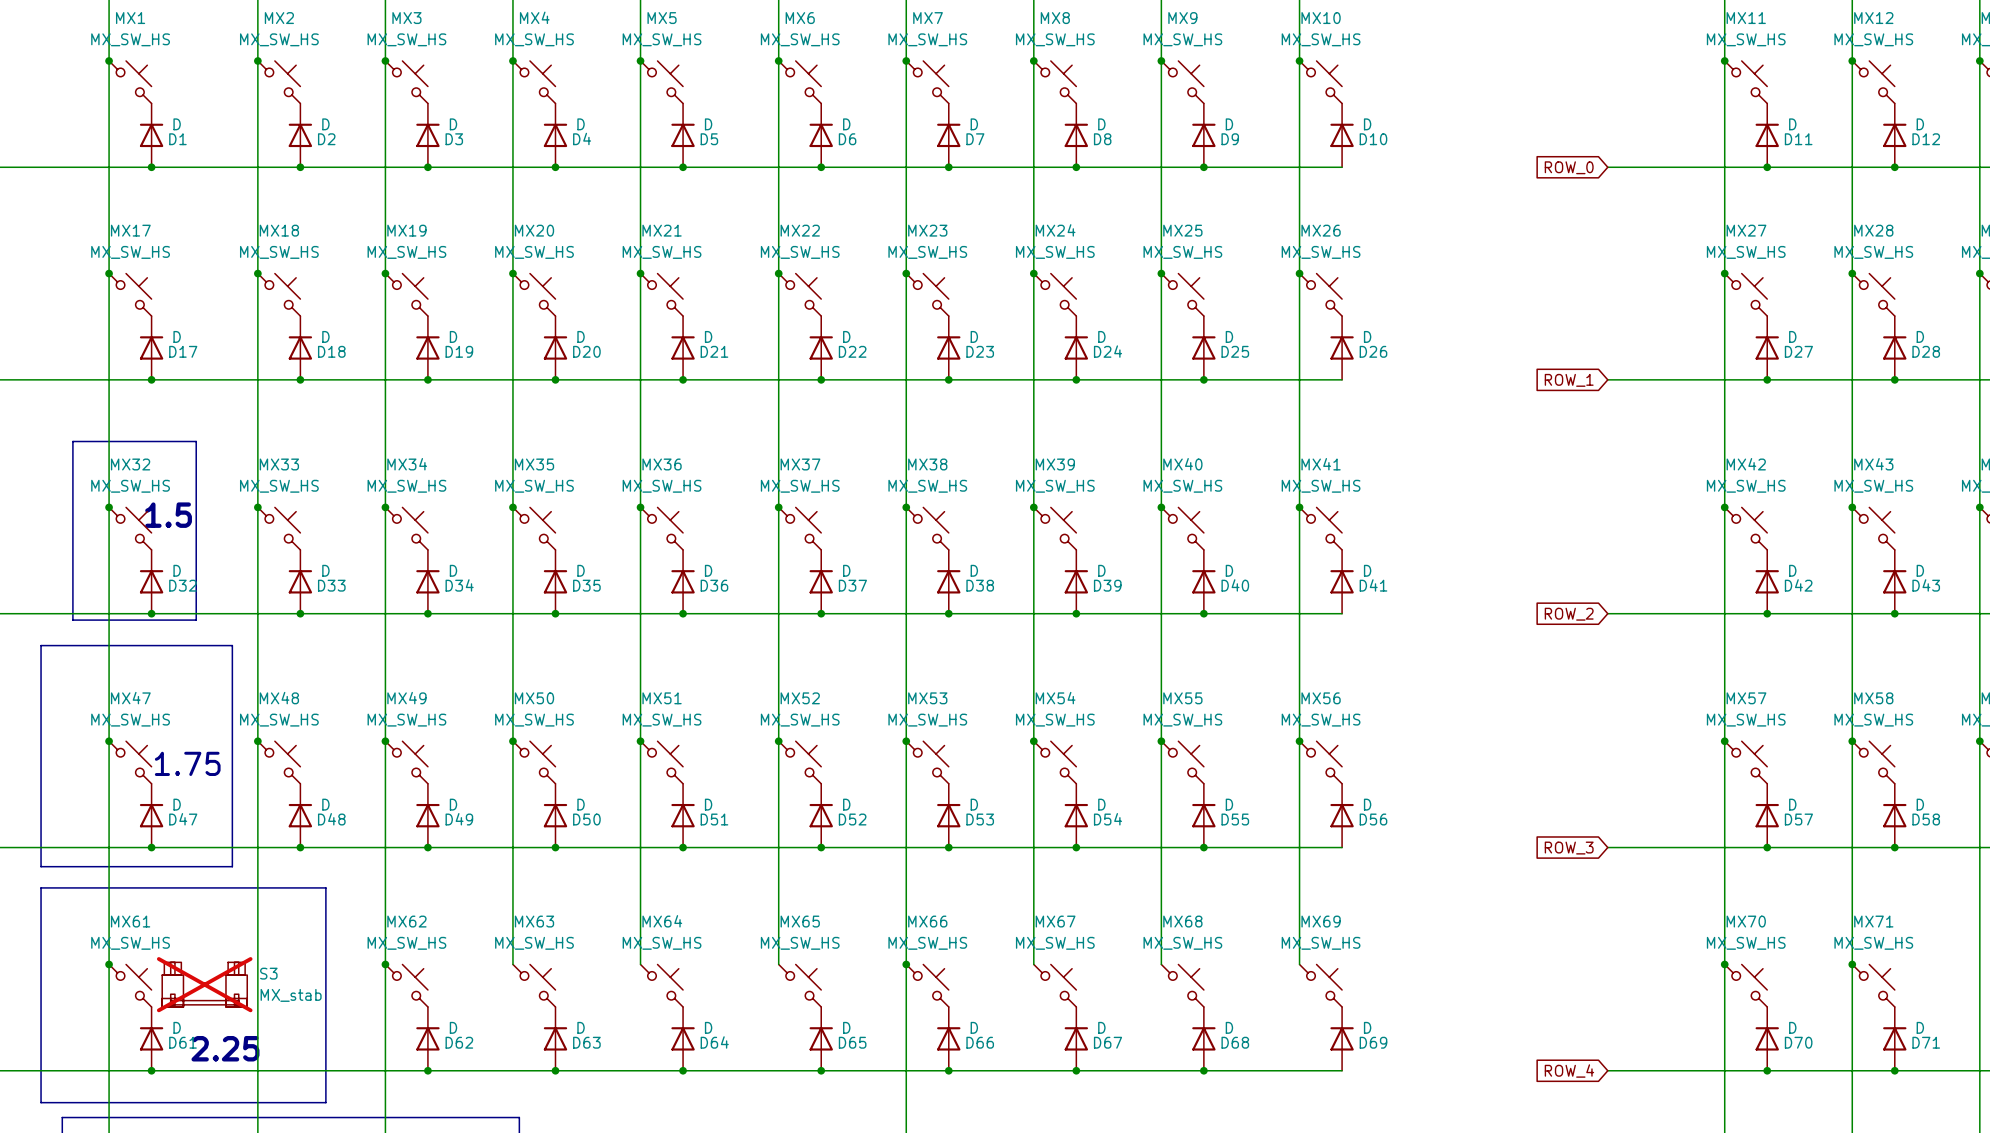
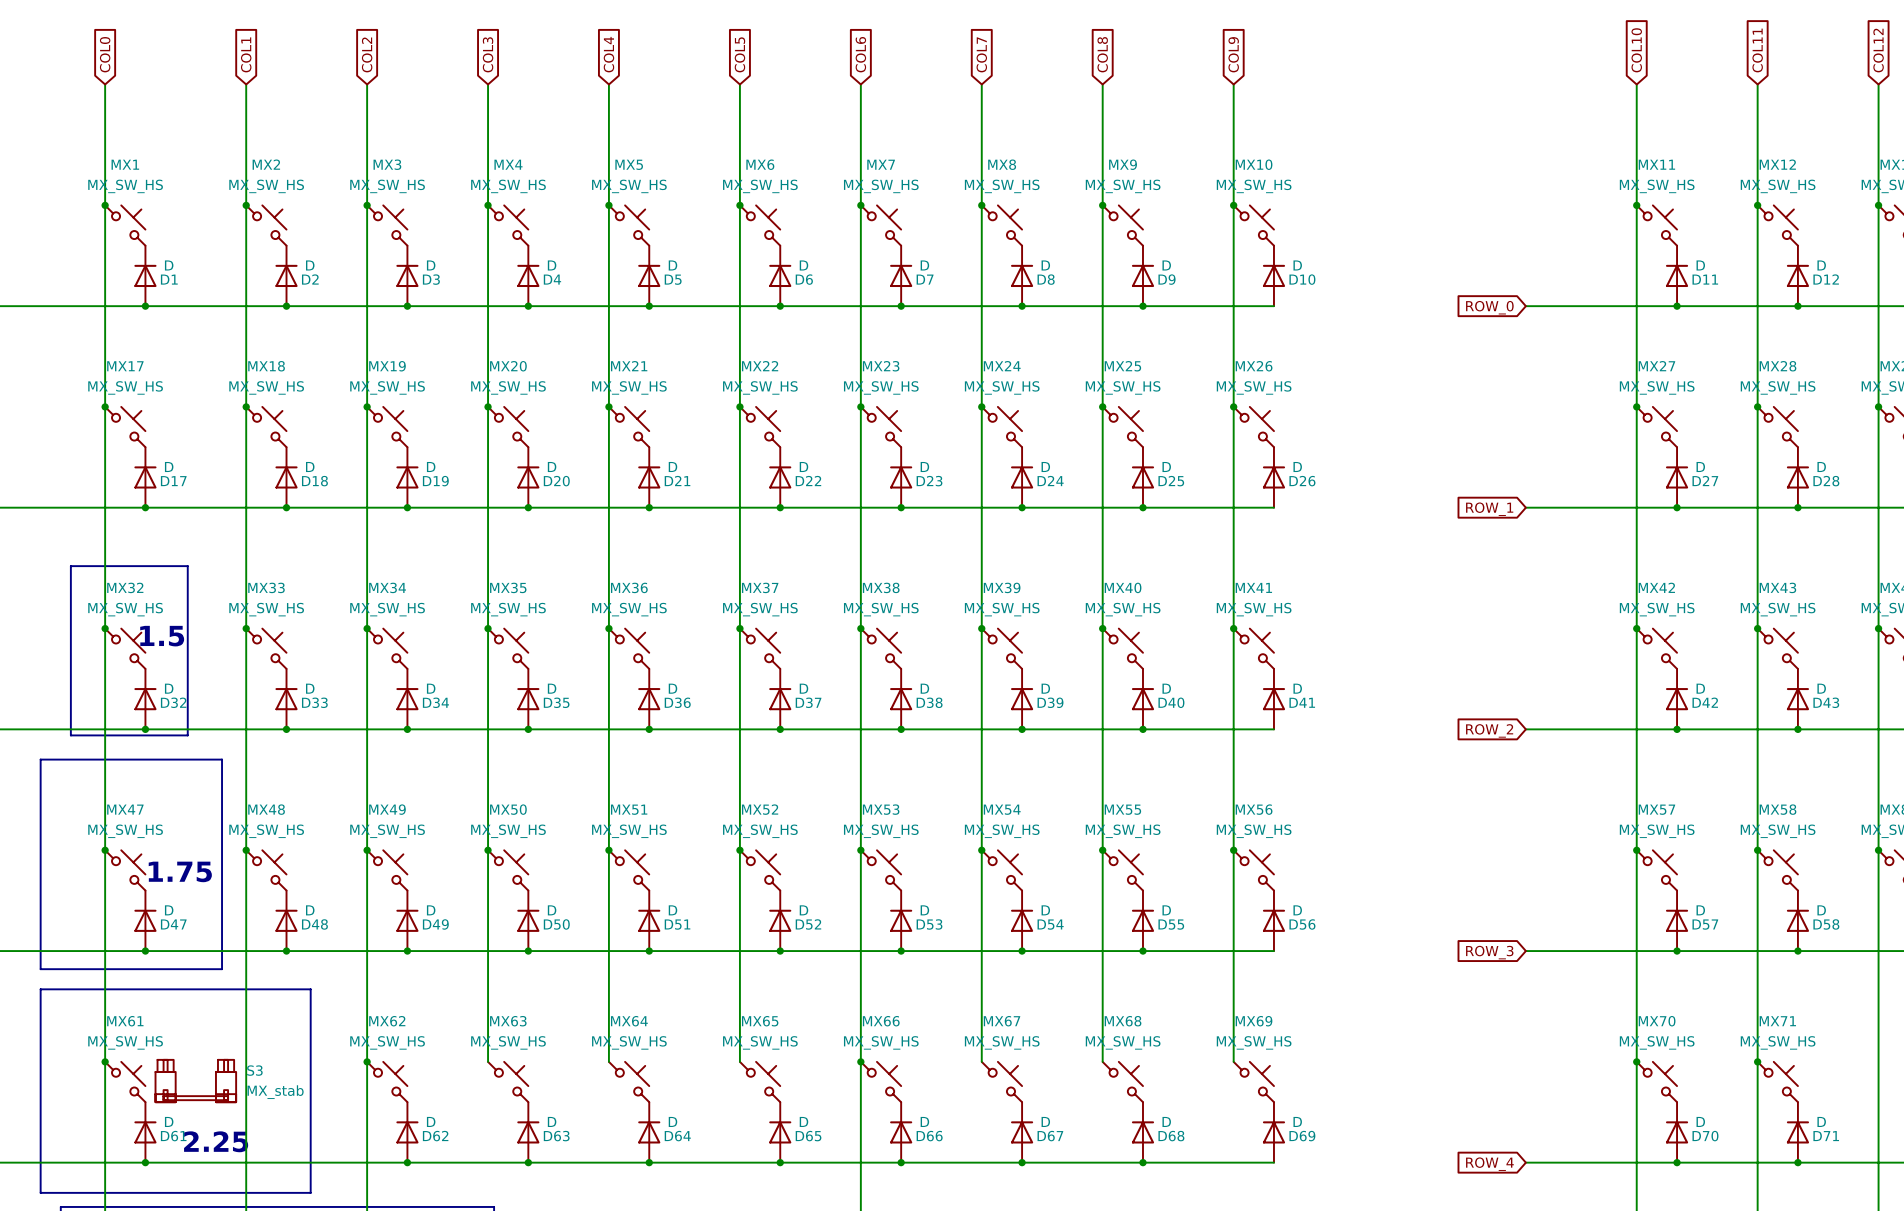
S3 do-not-place cross: (204, 984) -> none

